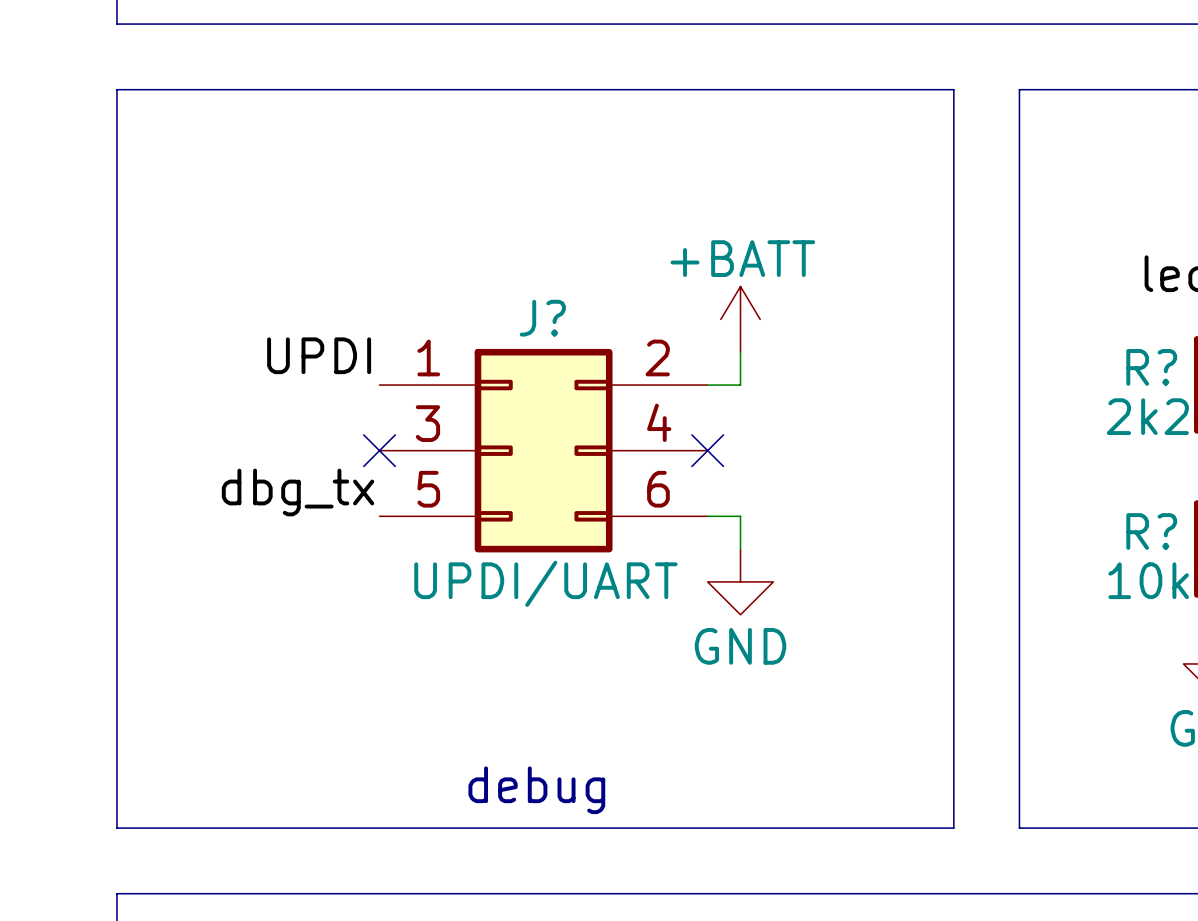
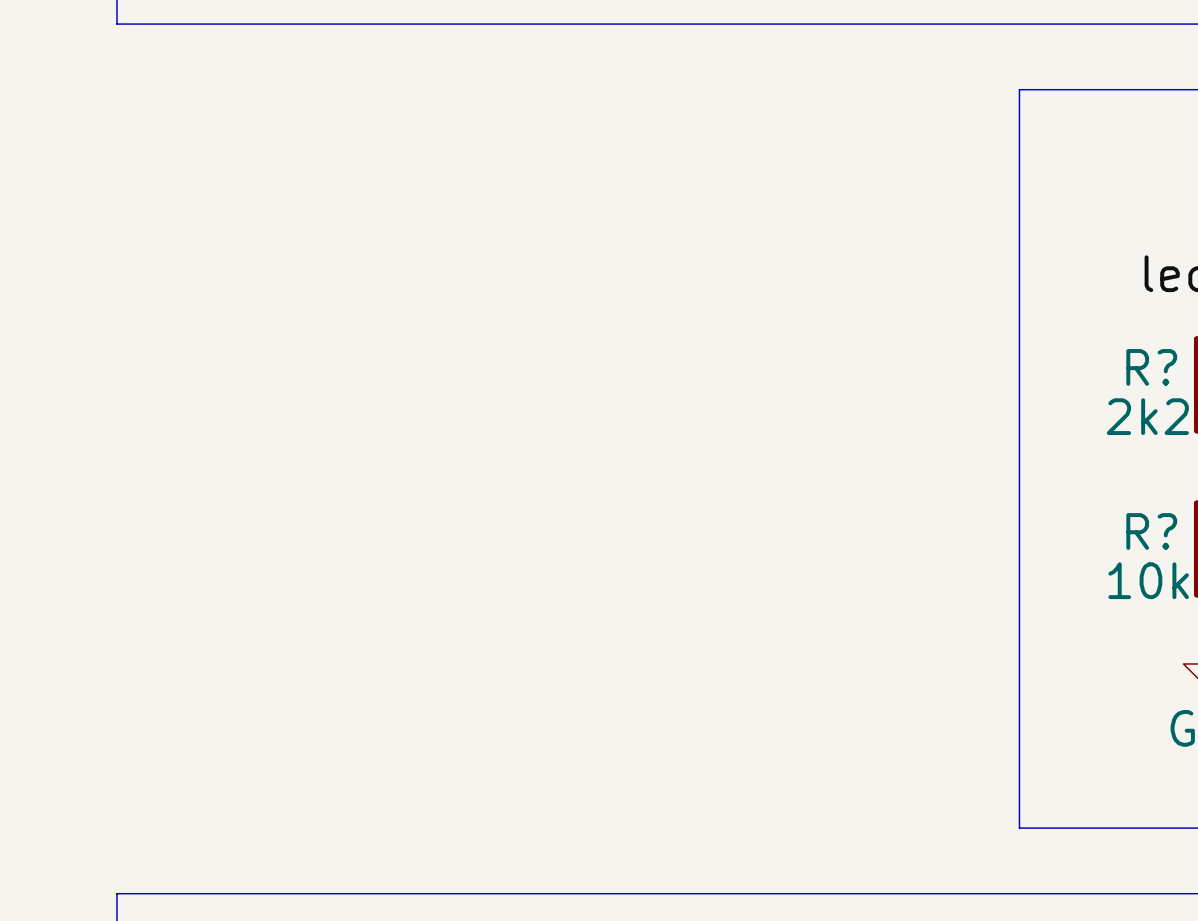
line: (116, 89) (953, 89) (953, 828) (116, 828) (116, 89) -> none
power symbol: +BATT (740, 319) -> none
wire: (740, 352) (740, 385) (707, 385) -> none
label: UPDI (319, 355) -> none
no-connect mark: (379, 450) -> none
J?: UPDI/UART (543, 450) -> none
no-connect mark: (707, 450) -> none
label: dbg_tx (298, 492) -> none
wire: (707, 516) (740, 516) (740, 549) -> none
power symbol: GND (740, 581) -> none
text: debug (536, 790) -> none

